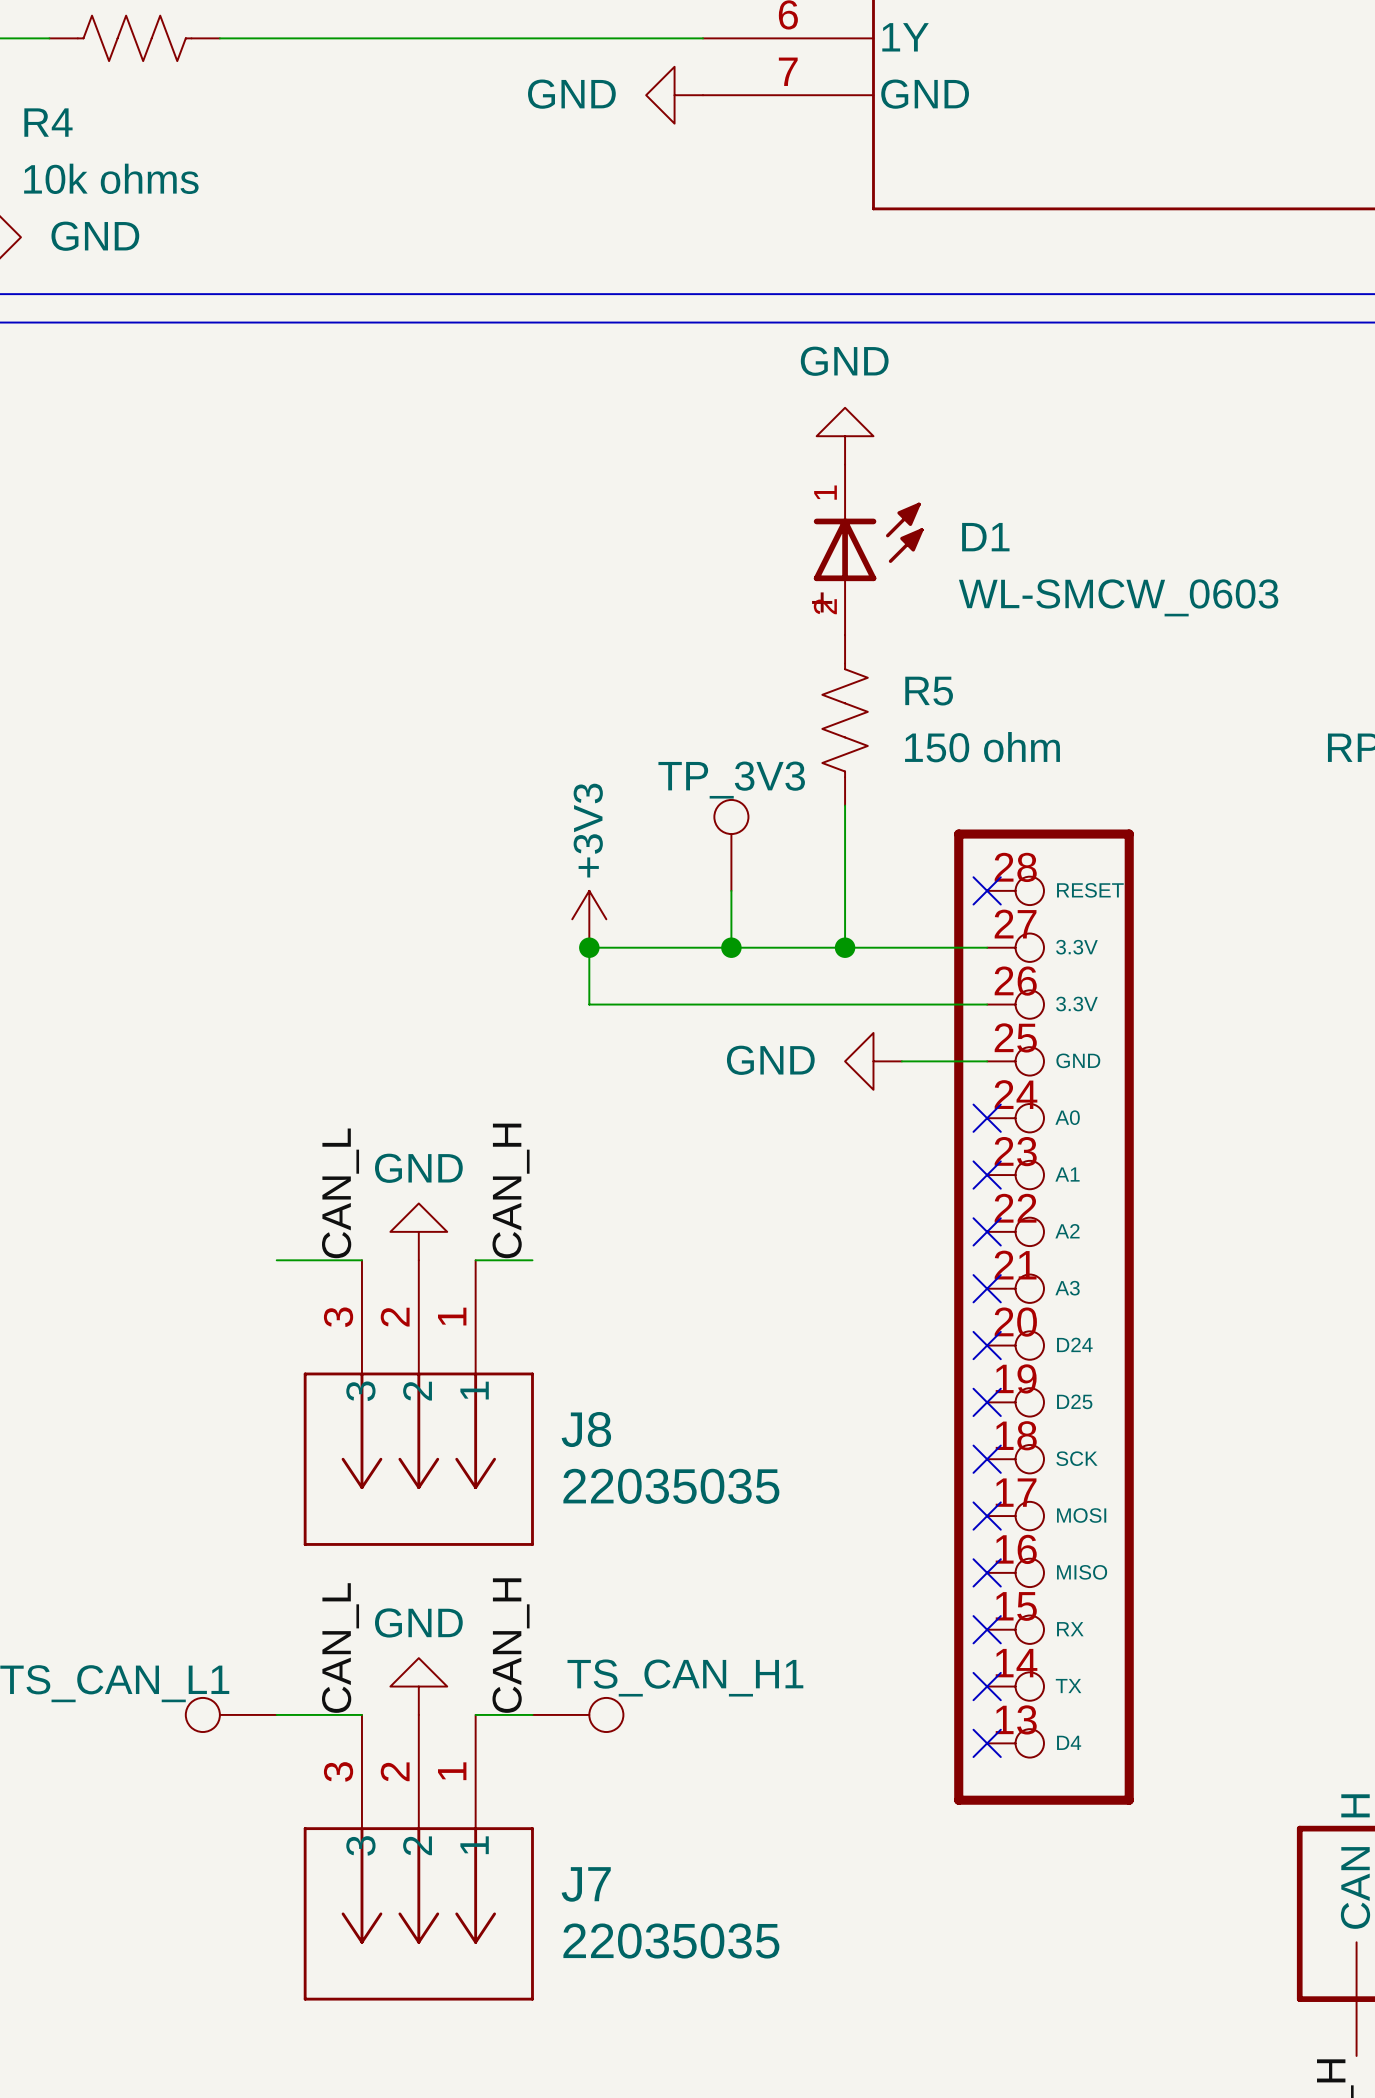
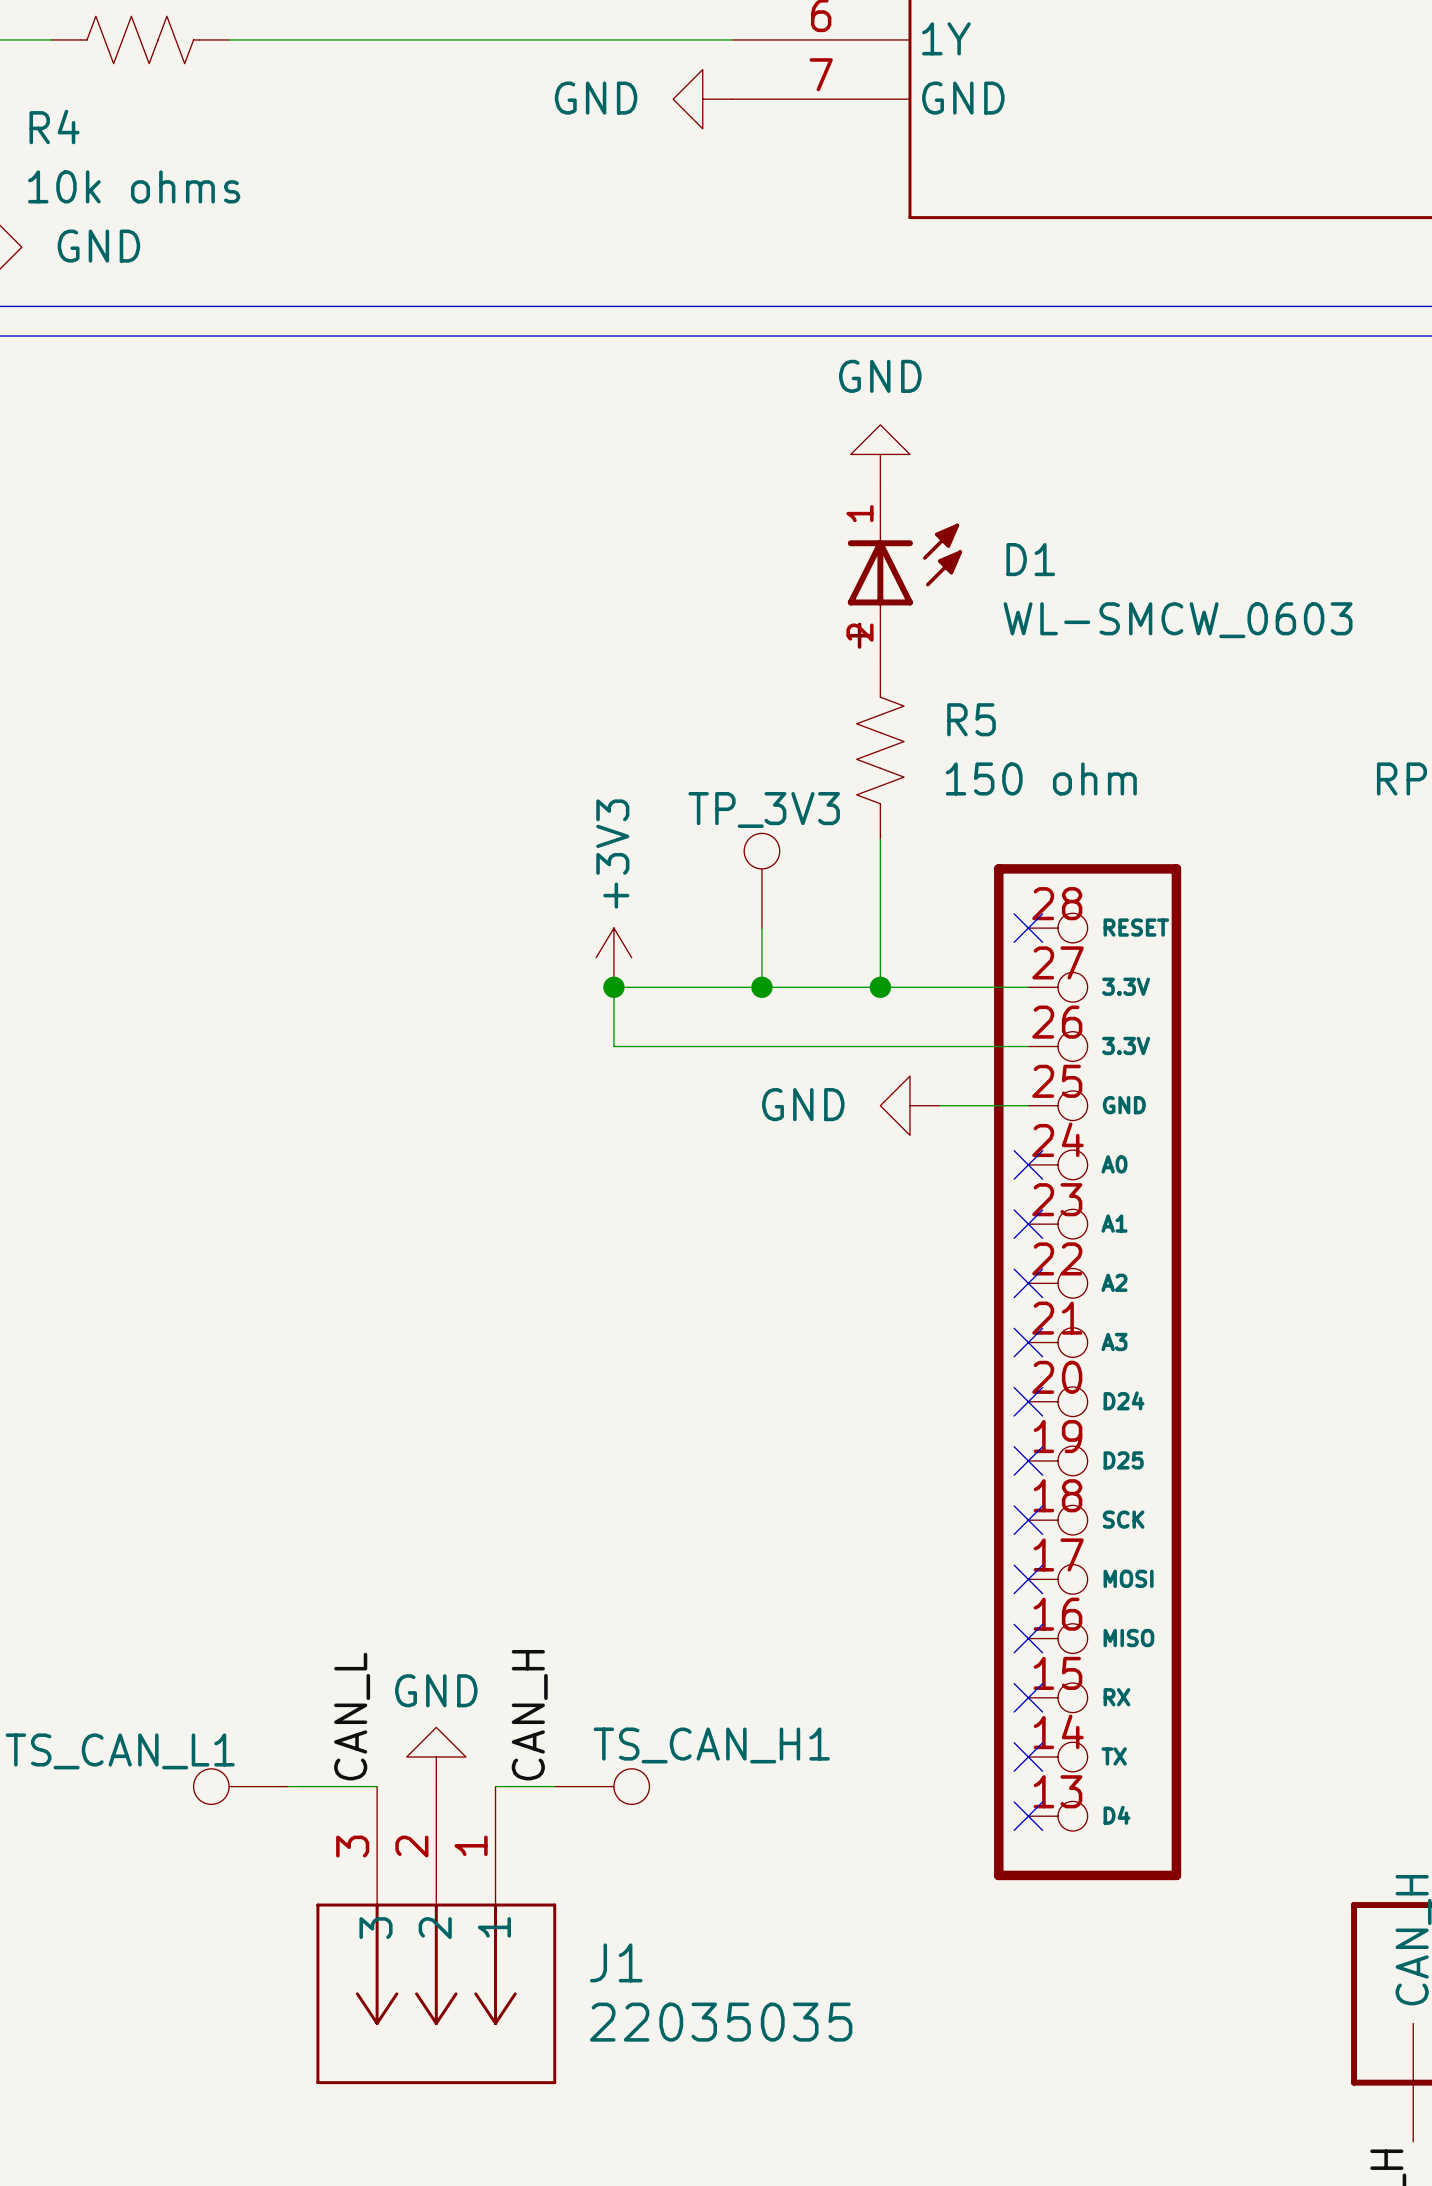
label: CAN_H (511, 1190) -> none
label: CAN_L (340, 1193) -> none
power symbol: GND (418, 1231) -> none
wire: (276, 1260) (361, 1260) -> none
wire: (475, 1260) (532, 1260) -> none
J8: 22035035 (418, 1403) -> none
J7 name: J7 (586, 1884) -> J1 (616, 1962)

